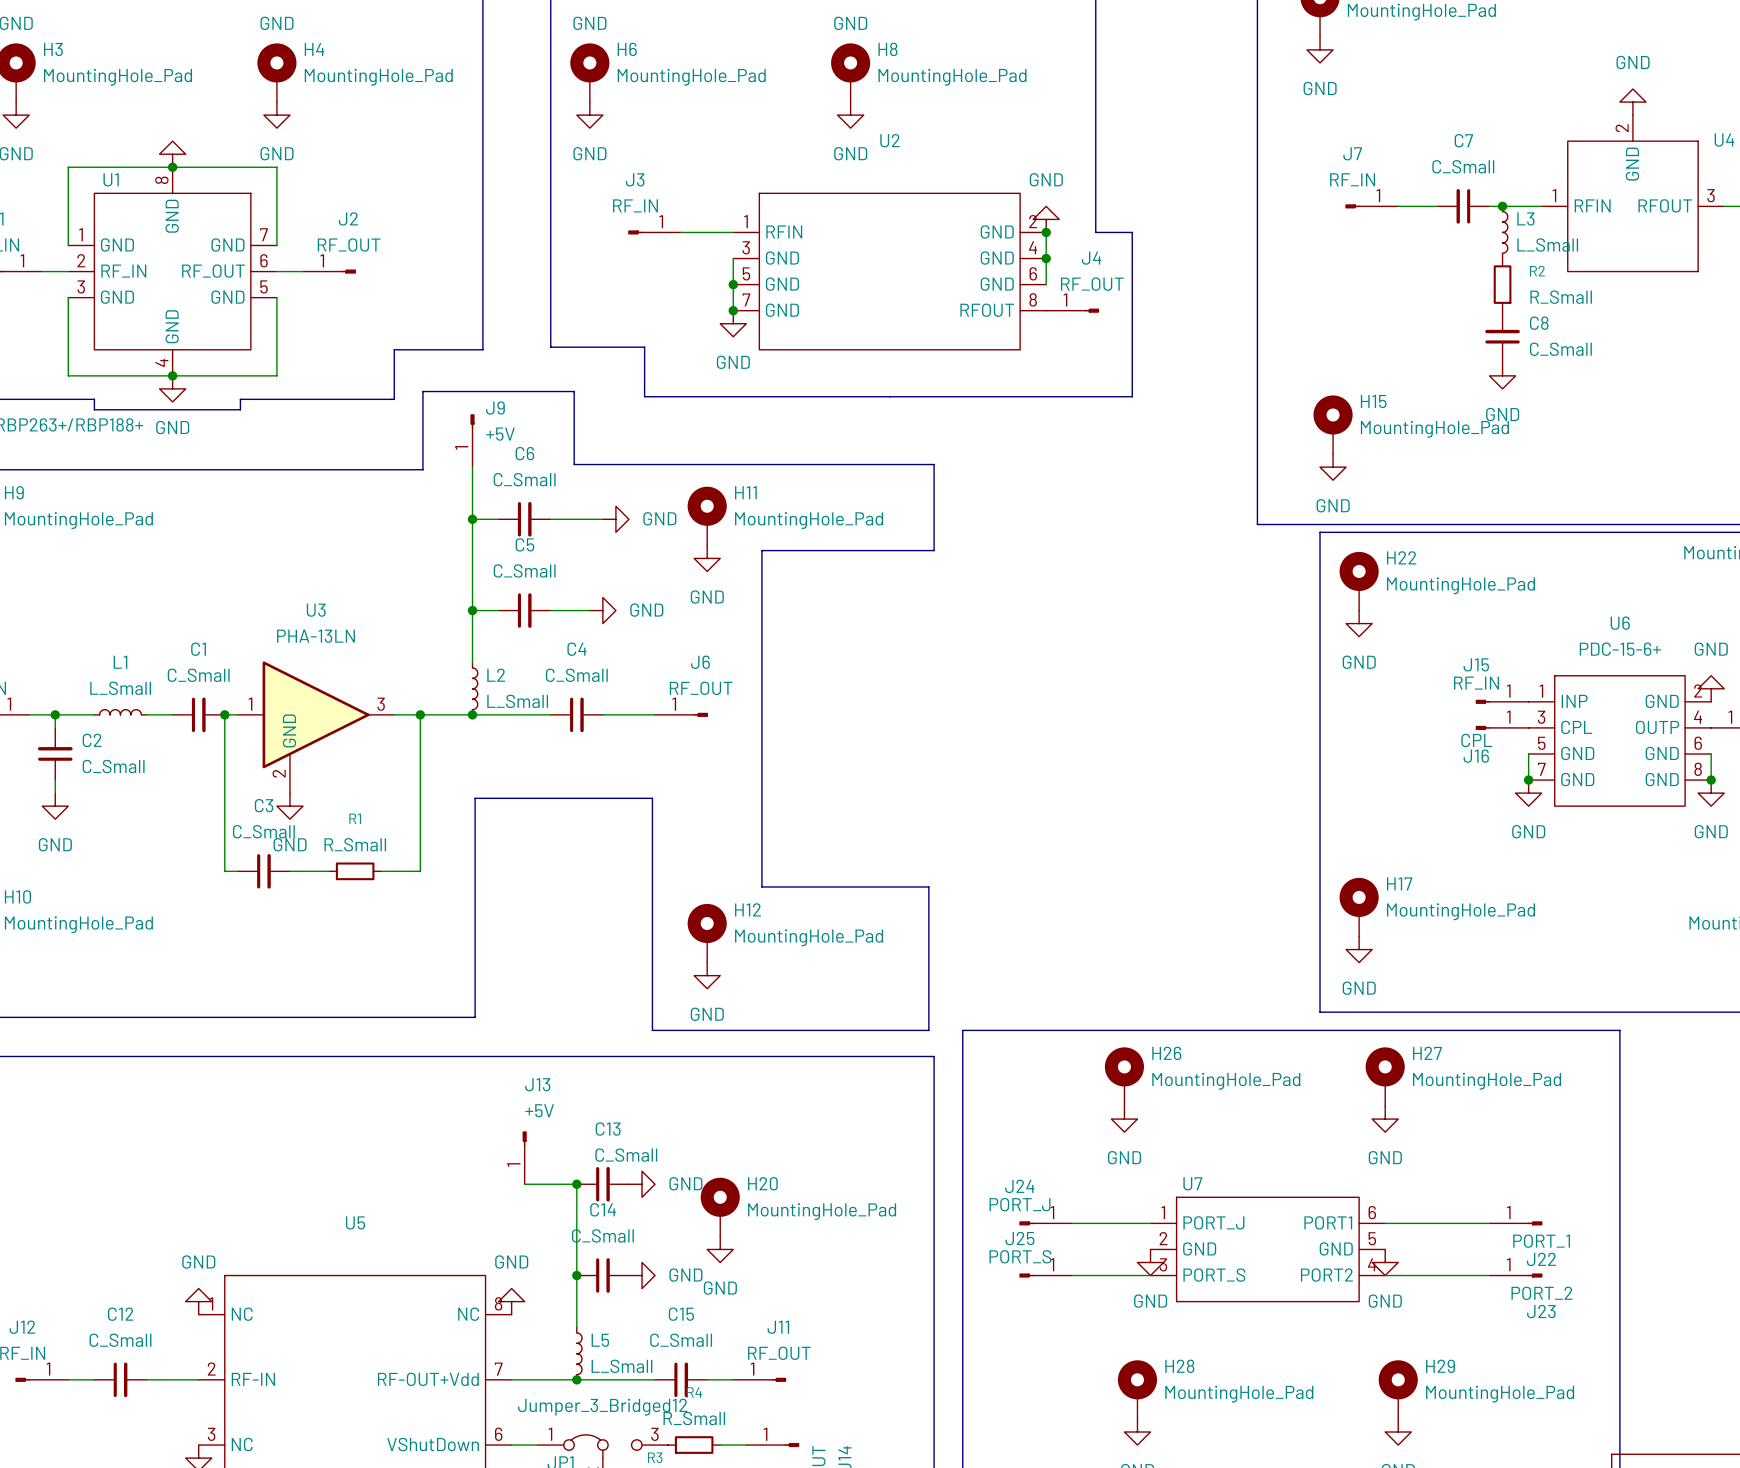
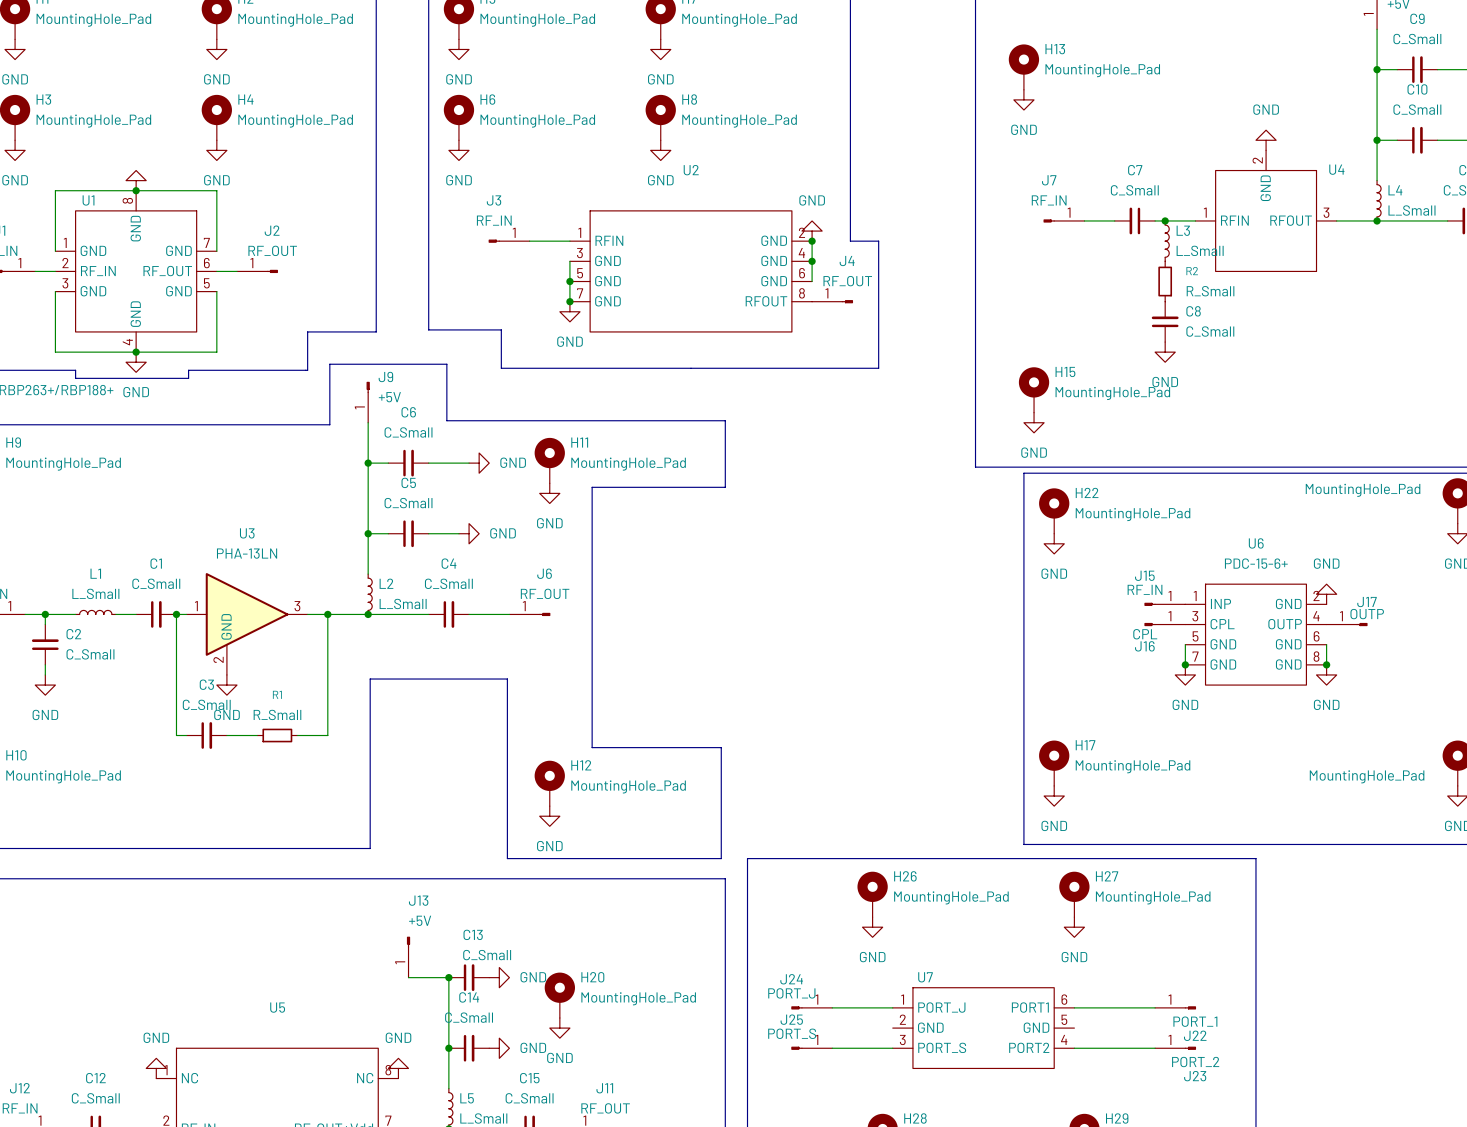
power symbol: GND (1150, 1262) -> none
power symbol: GND (1385, 1262) -> none

